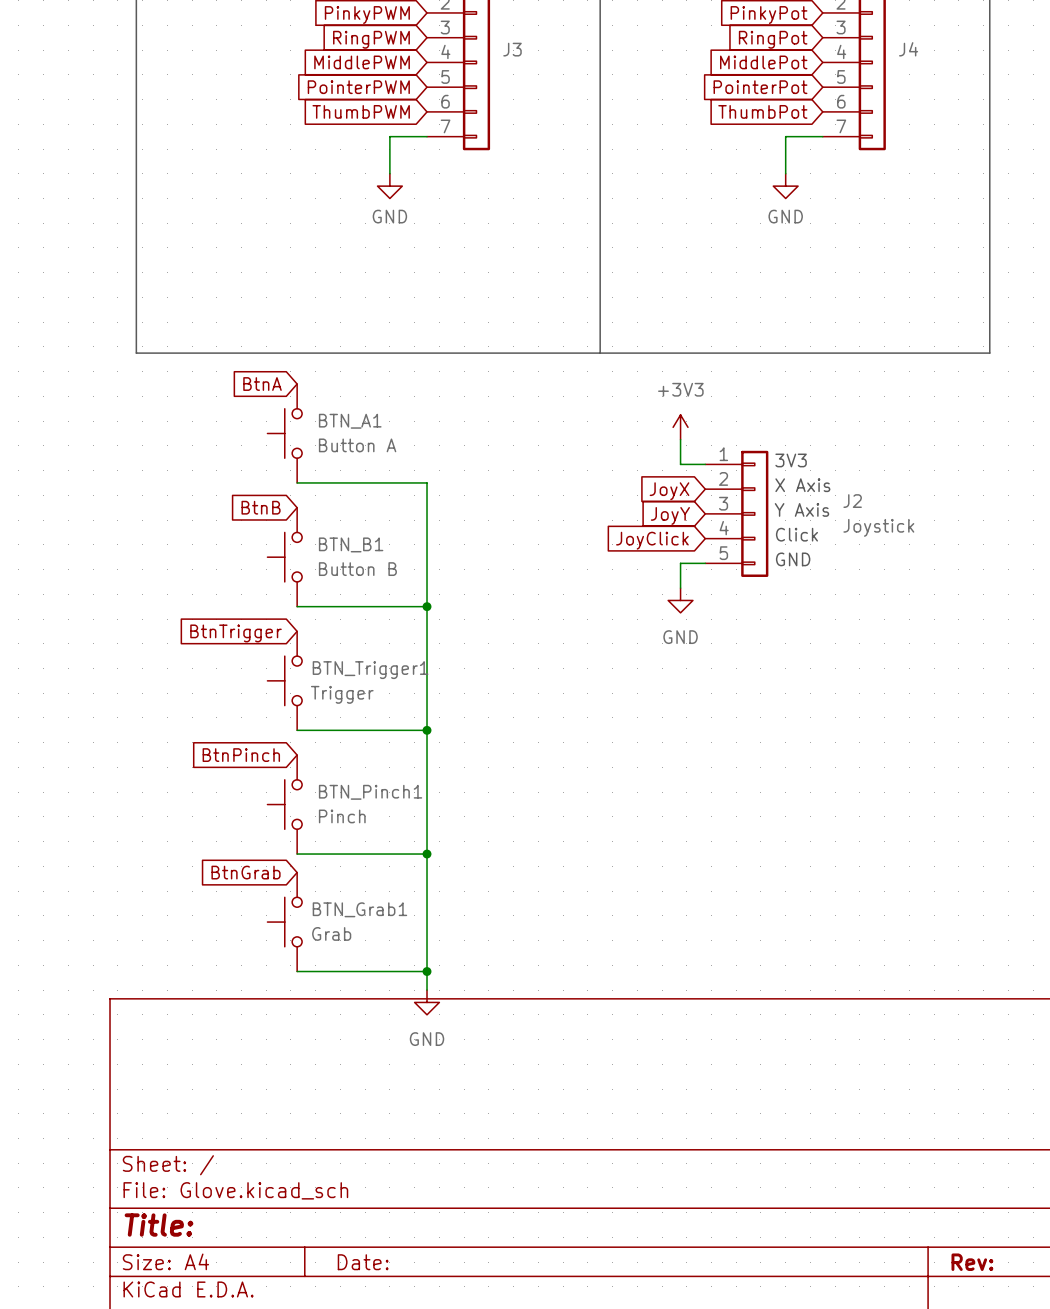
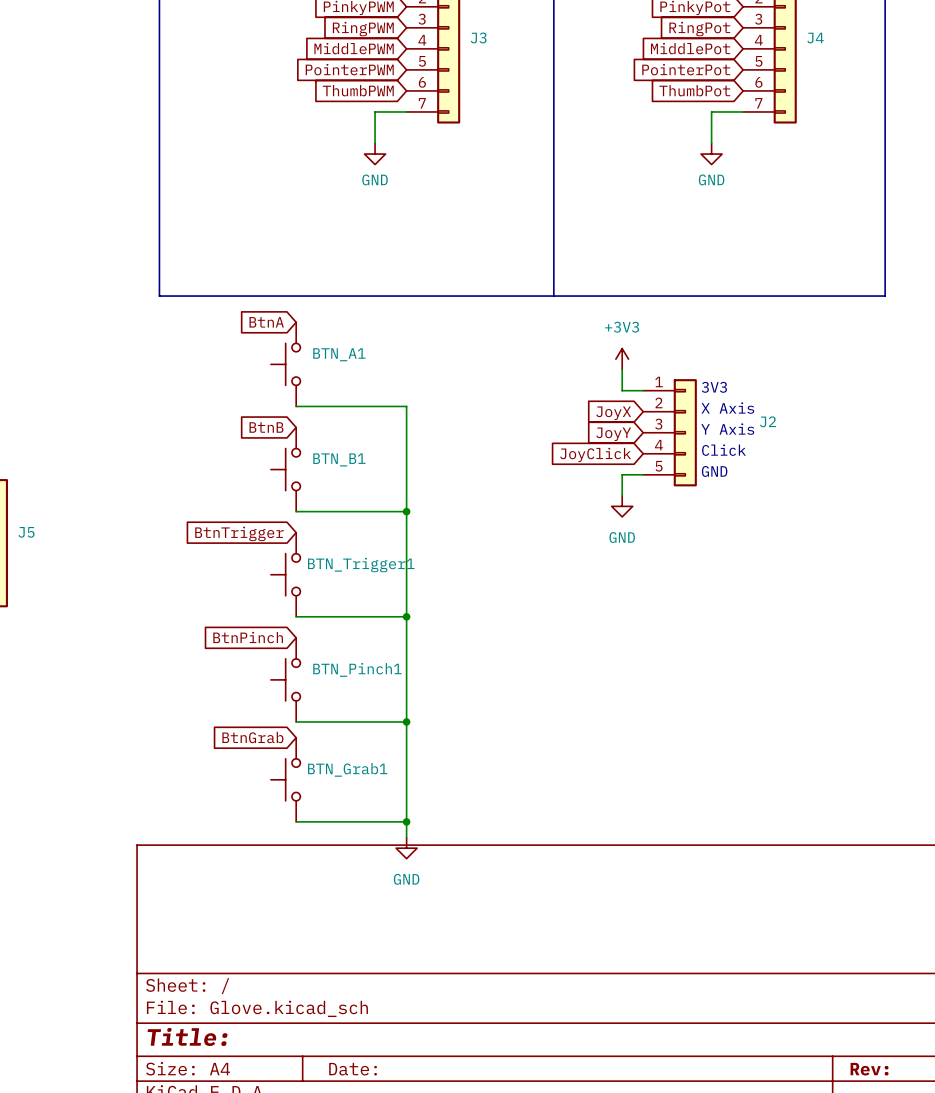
BTN_A1 value: Button A (357, 445) -> none
J2 value: Joystick (878, 527) -> none
BTN_B1 value: Button B (357, 569) -> none
BTN_Trigger1 value: Trigger (342, 694) -> none
BTN_Pinch1 value: Pinch (342, 816) -> none
BTN_Grab1 value: Grab (331, 933) -> none

